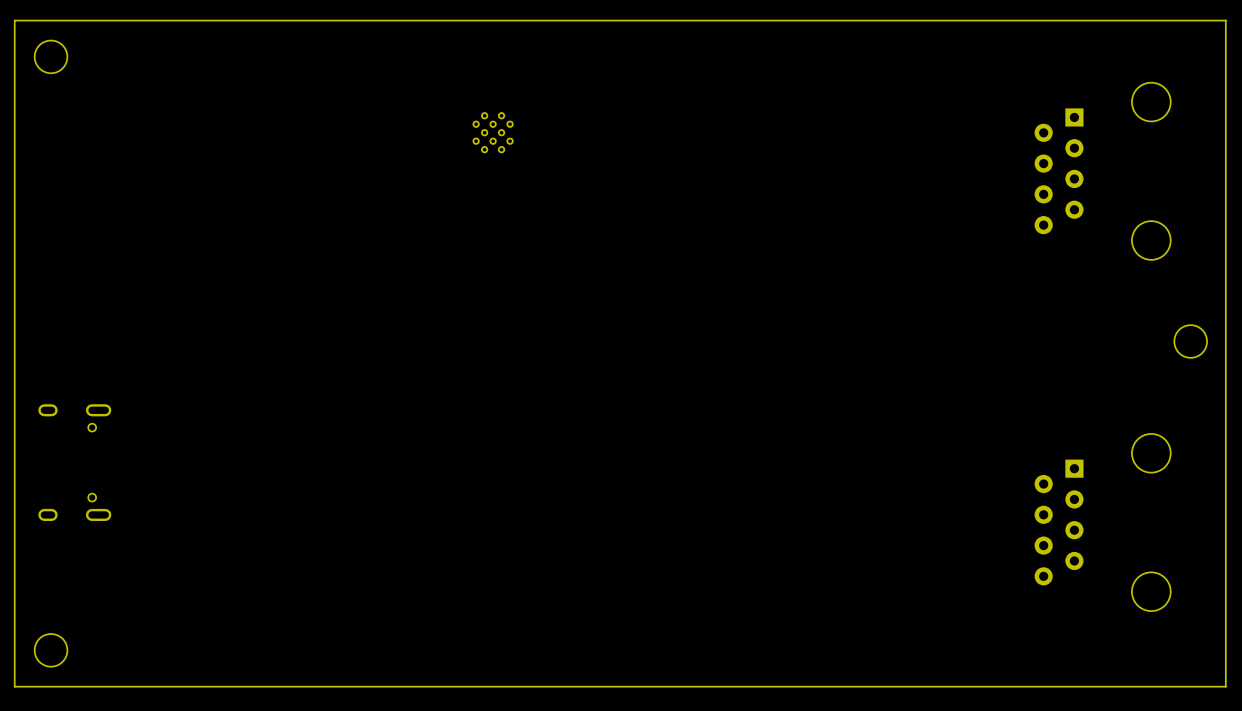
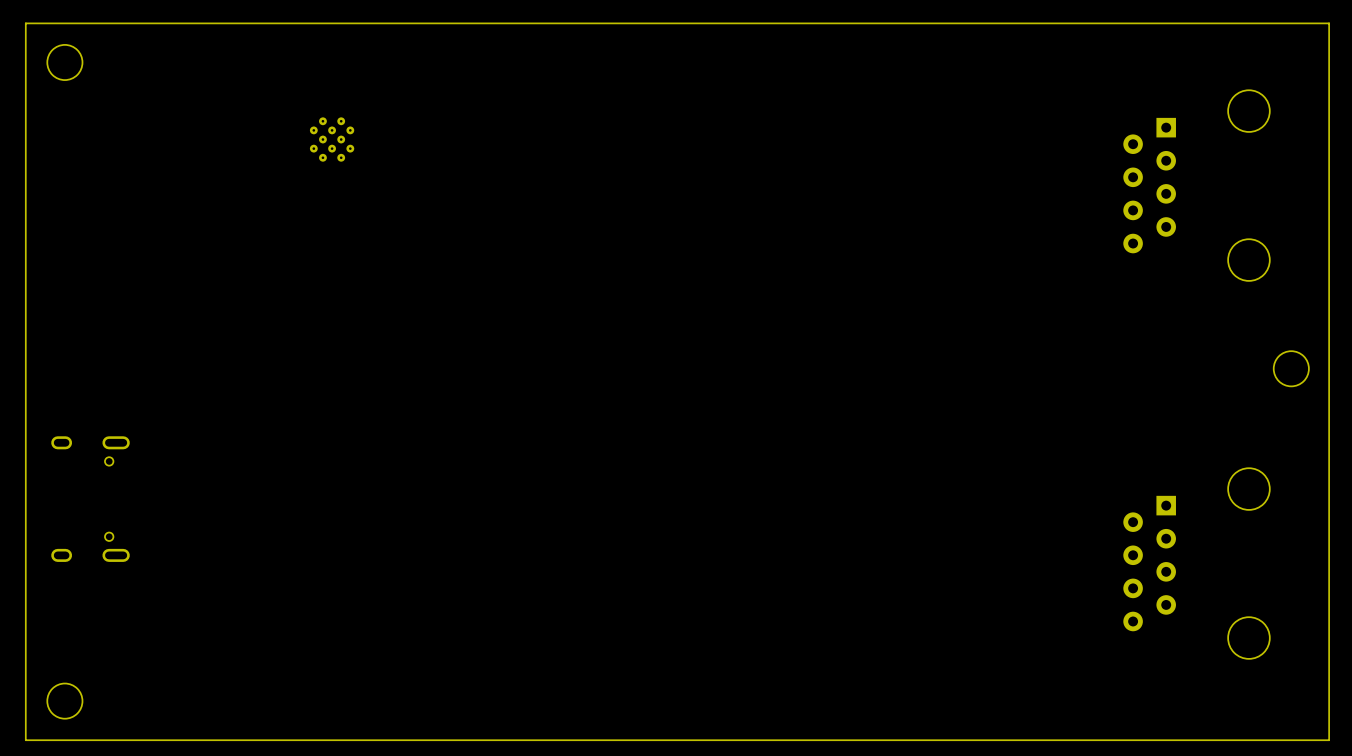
part: none -> (332, 139)
part: (493, 132) -> none

